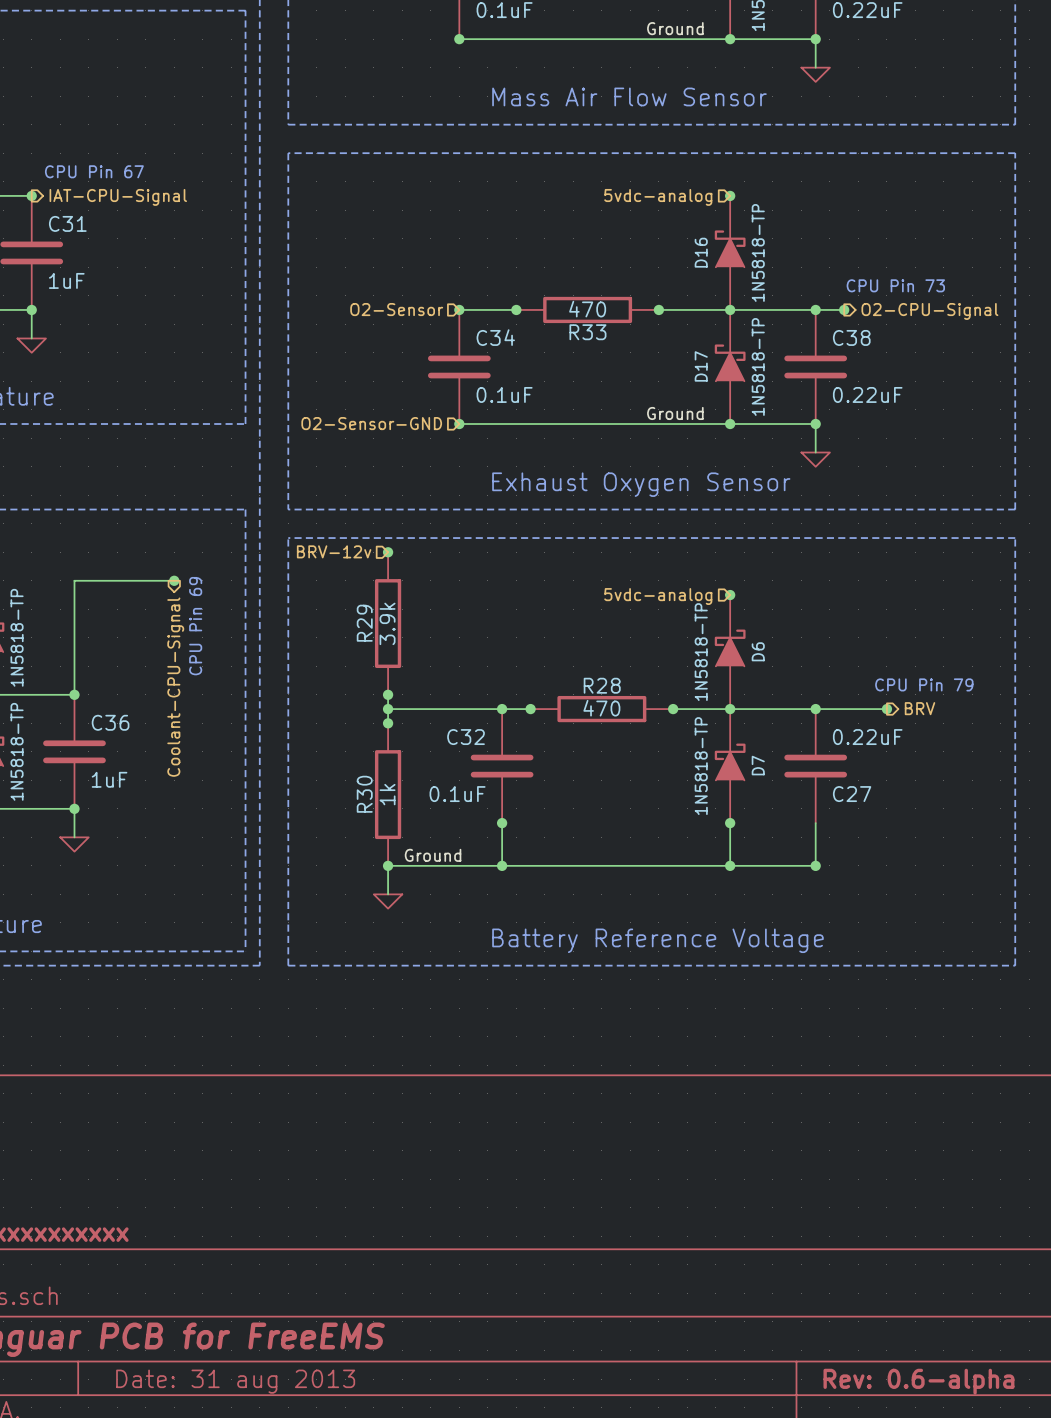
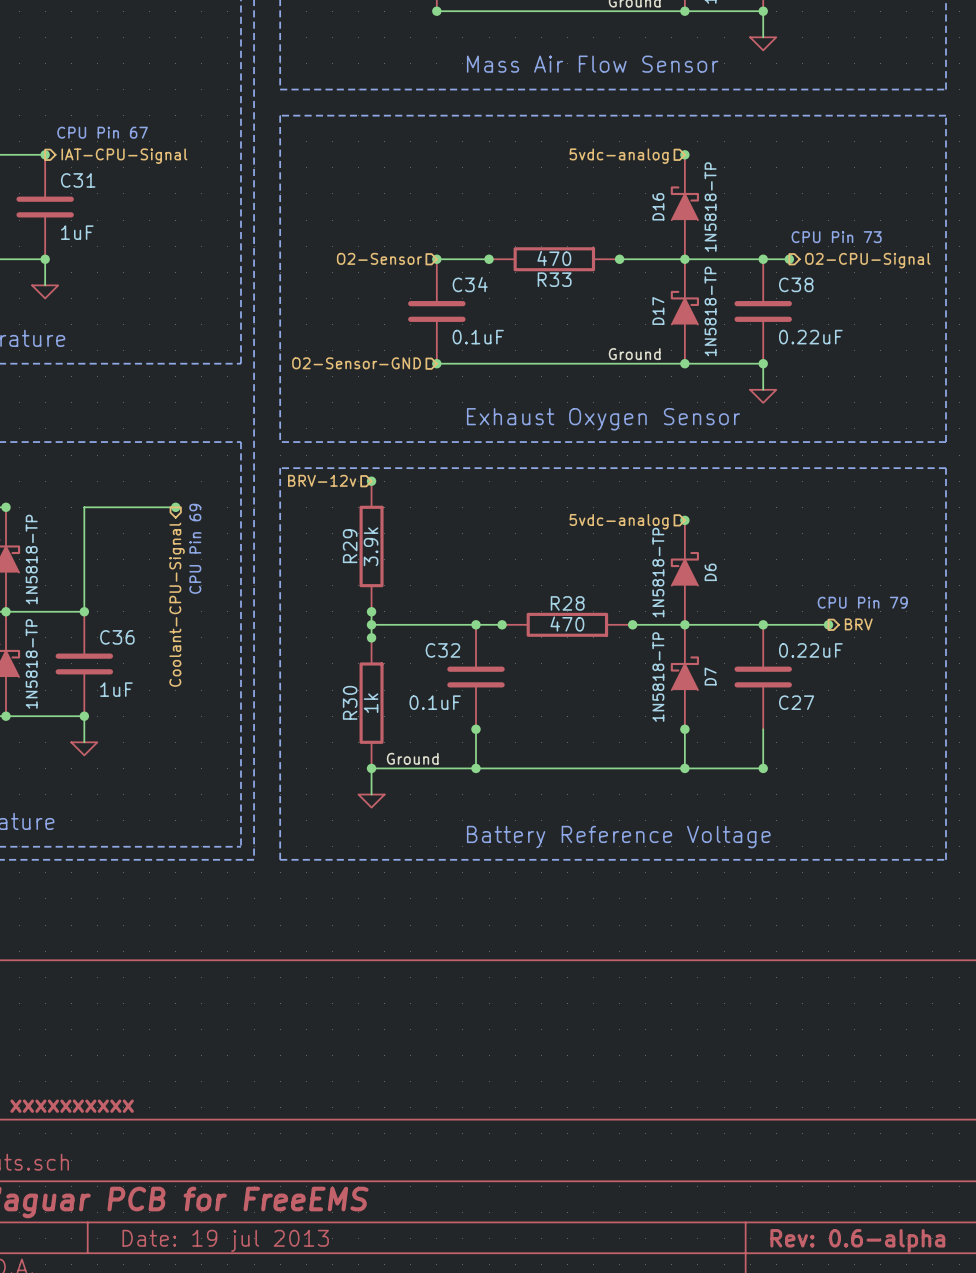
title block: Date: 31 aug 2013 (235, 1381) -> Date: 19 jul 2013 (225, 1240)

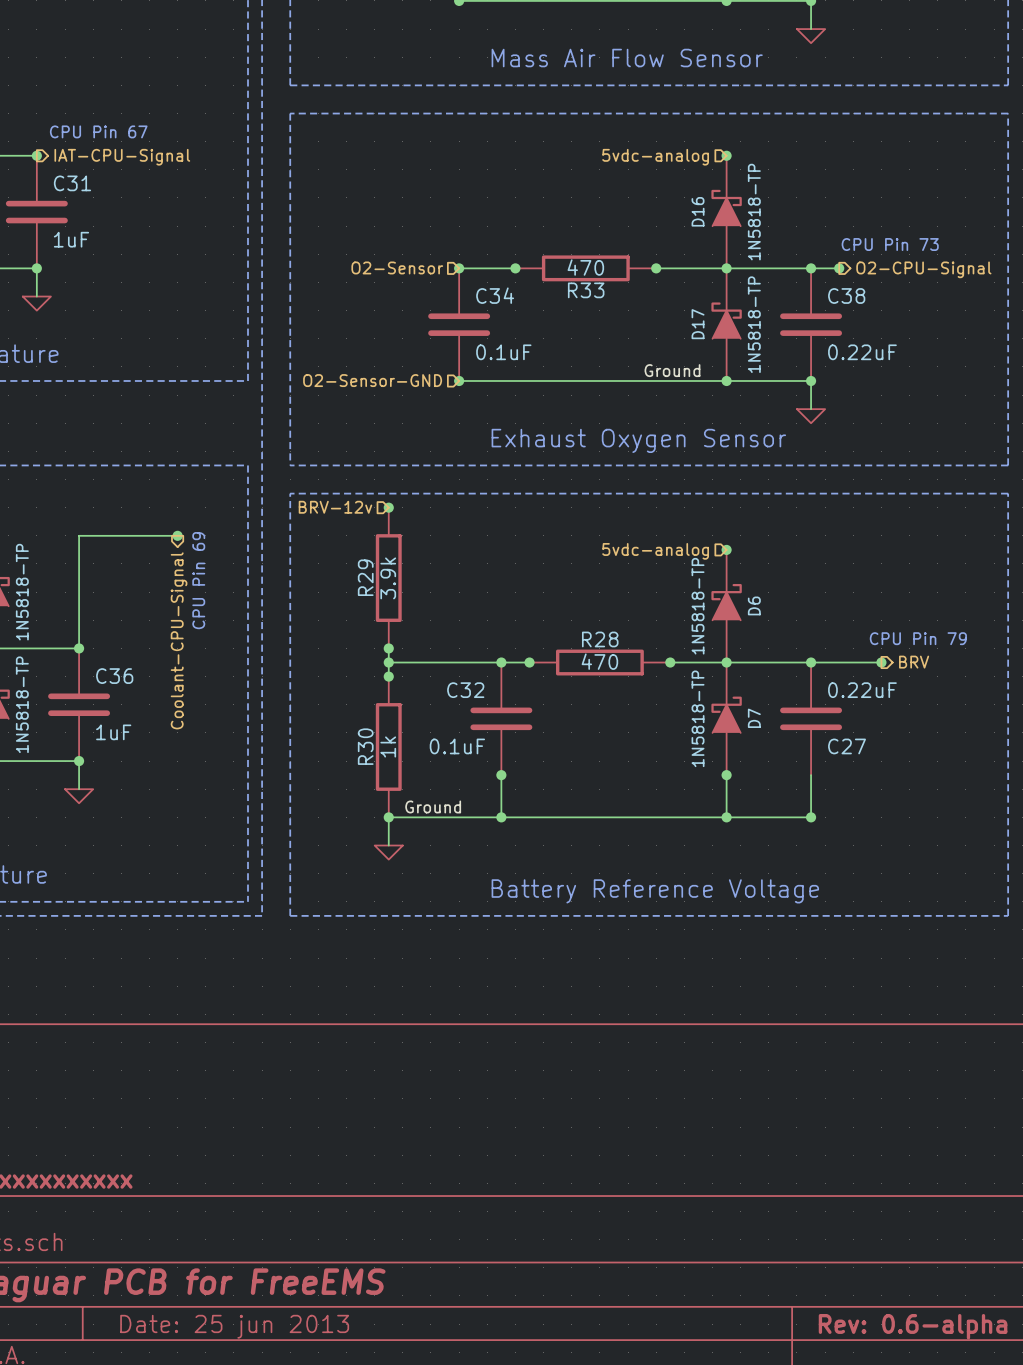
title block: Date: 19 jul 2013 (225, 1240) -> Date: 25 jun 2013 (234, 1326)

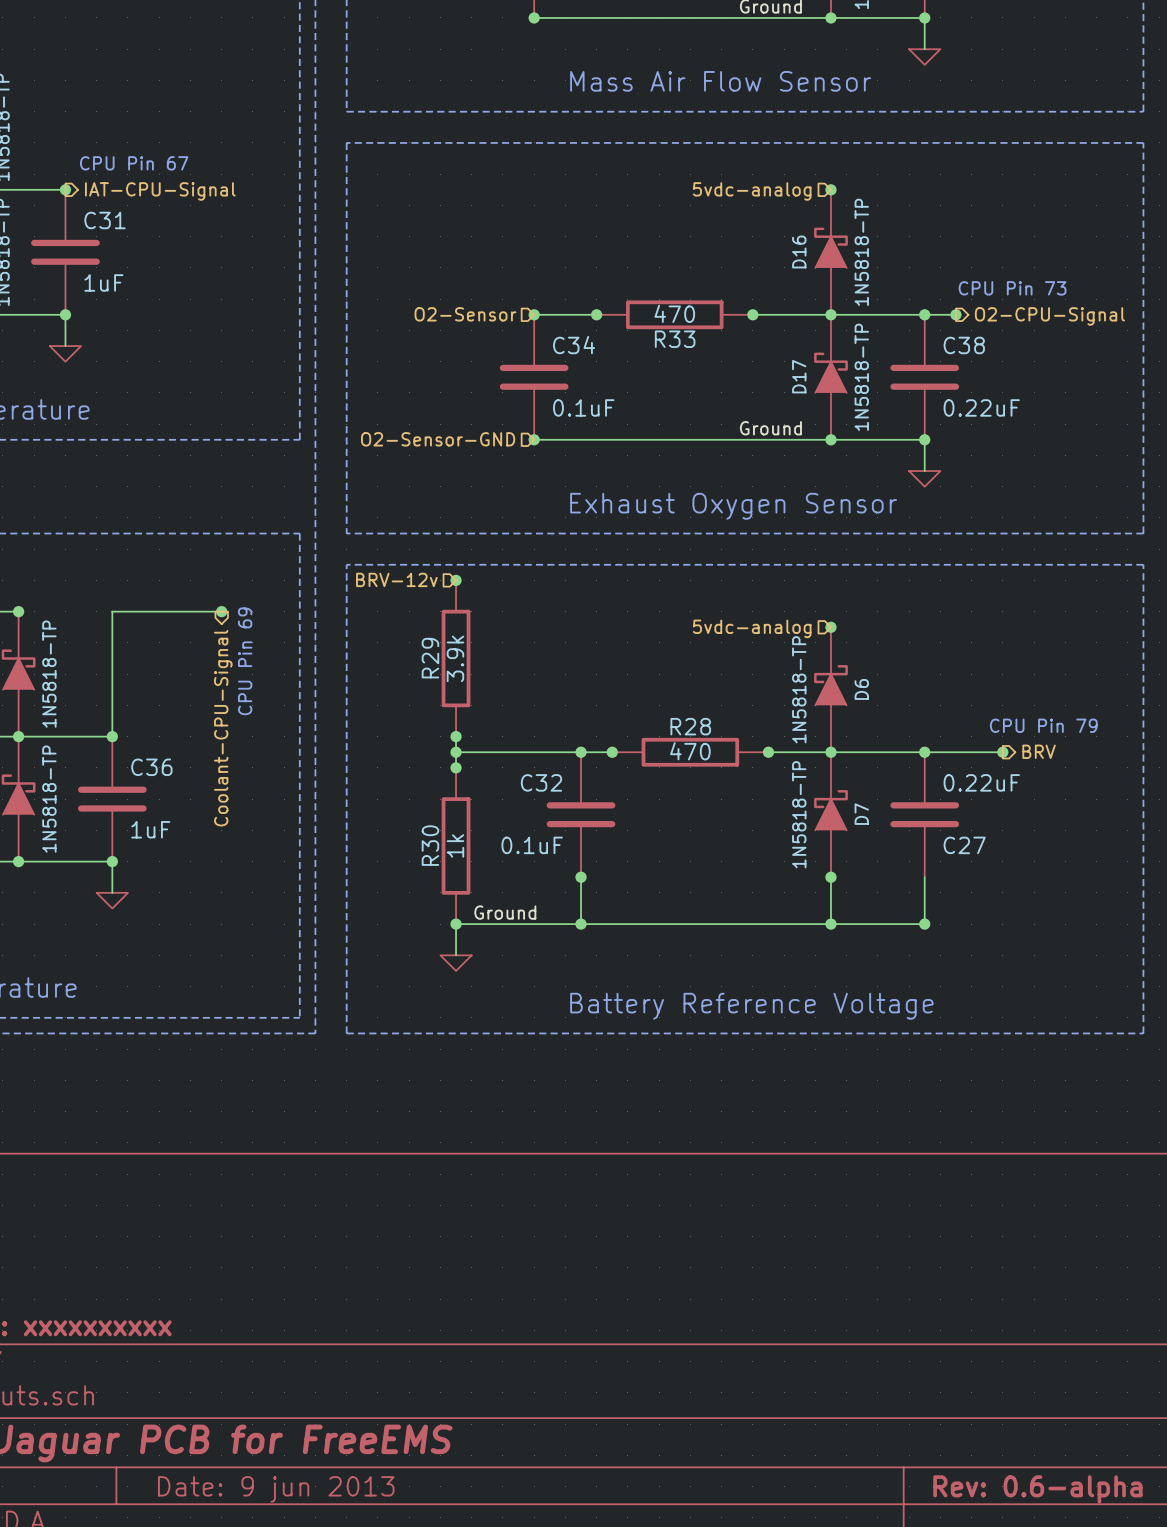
title block: Date: 25 jun 2013 (234, 1326) -> Date: 9 jun 2013 (276, 1489)

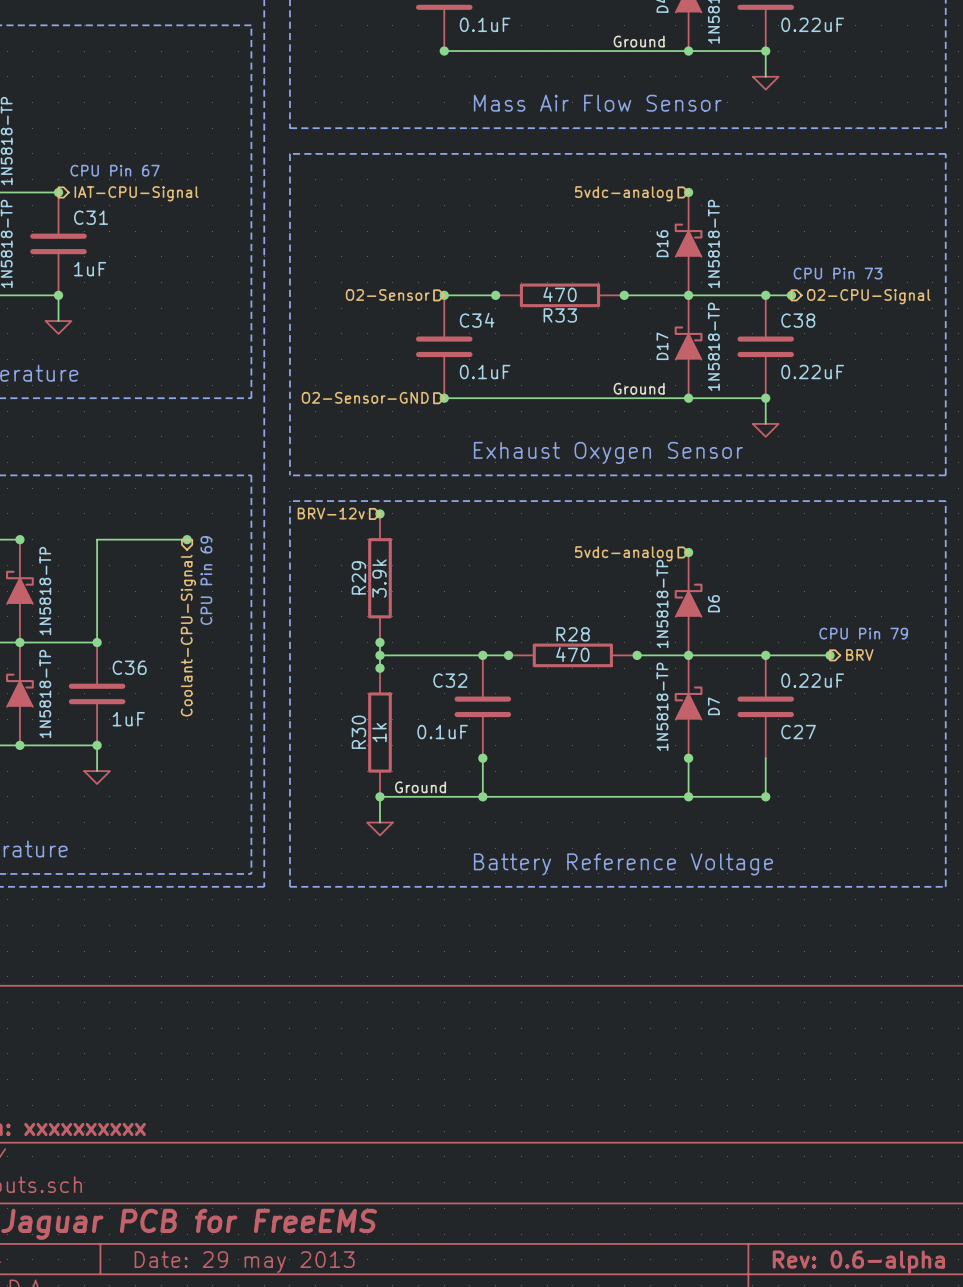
title block: Date: 9 jun 2013 (276, 1489) -> Date: 29 may 2013 (244, 1262)

